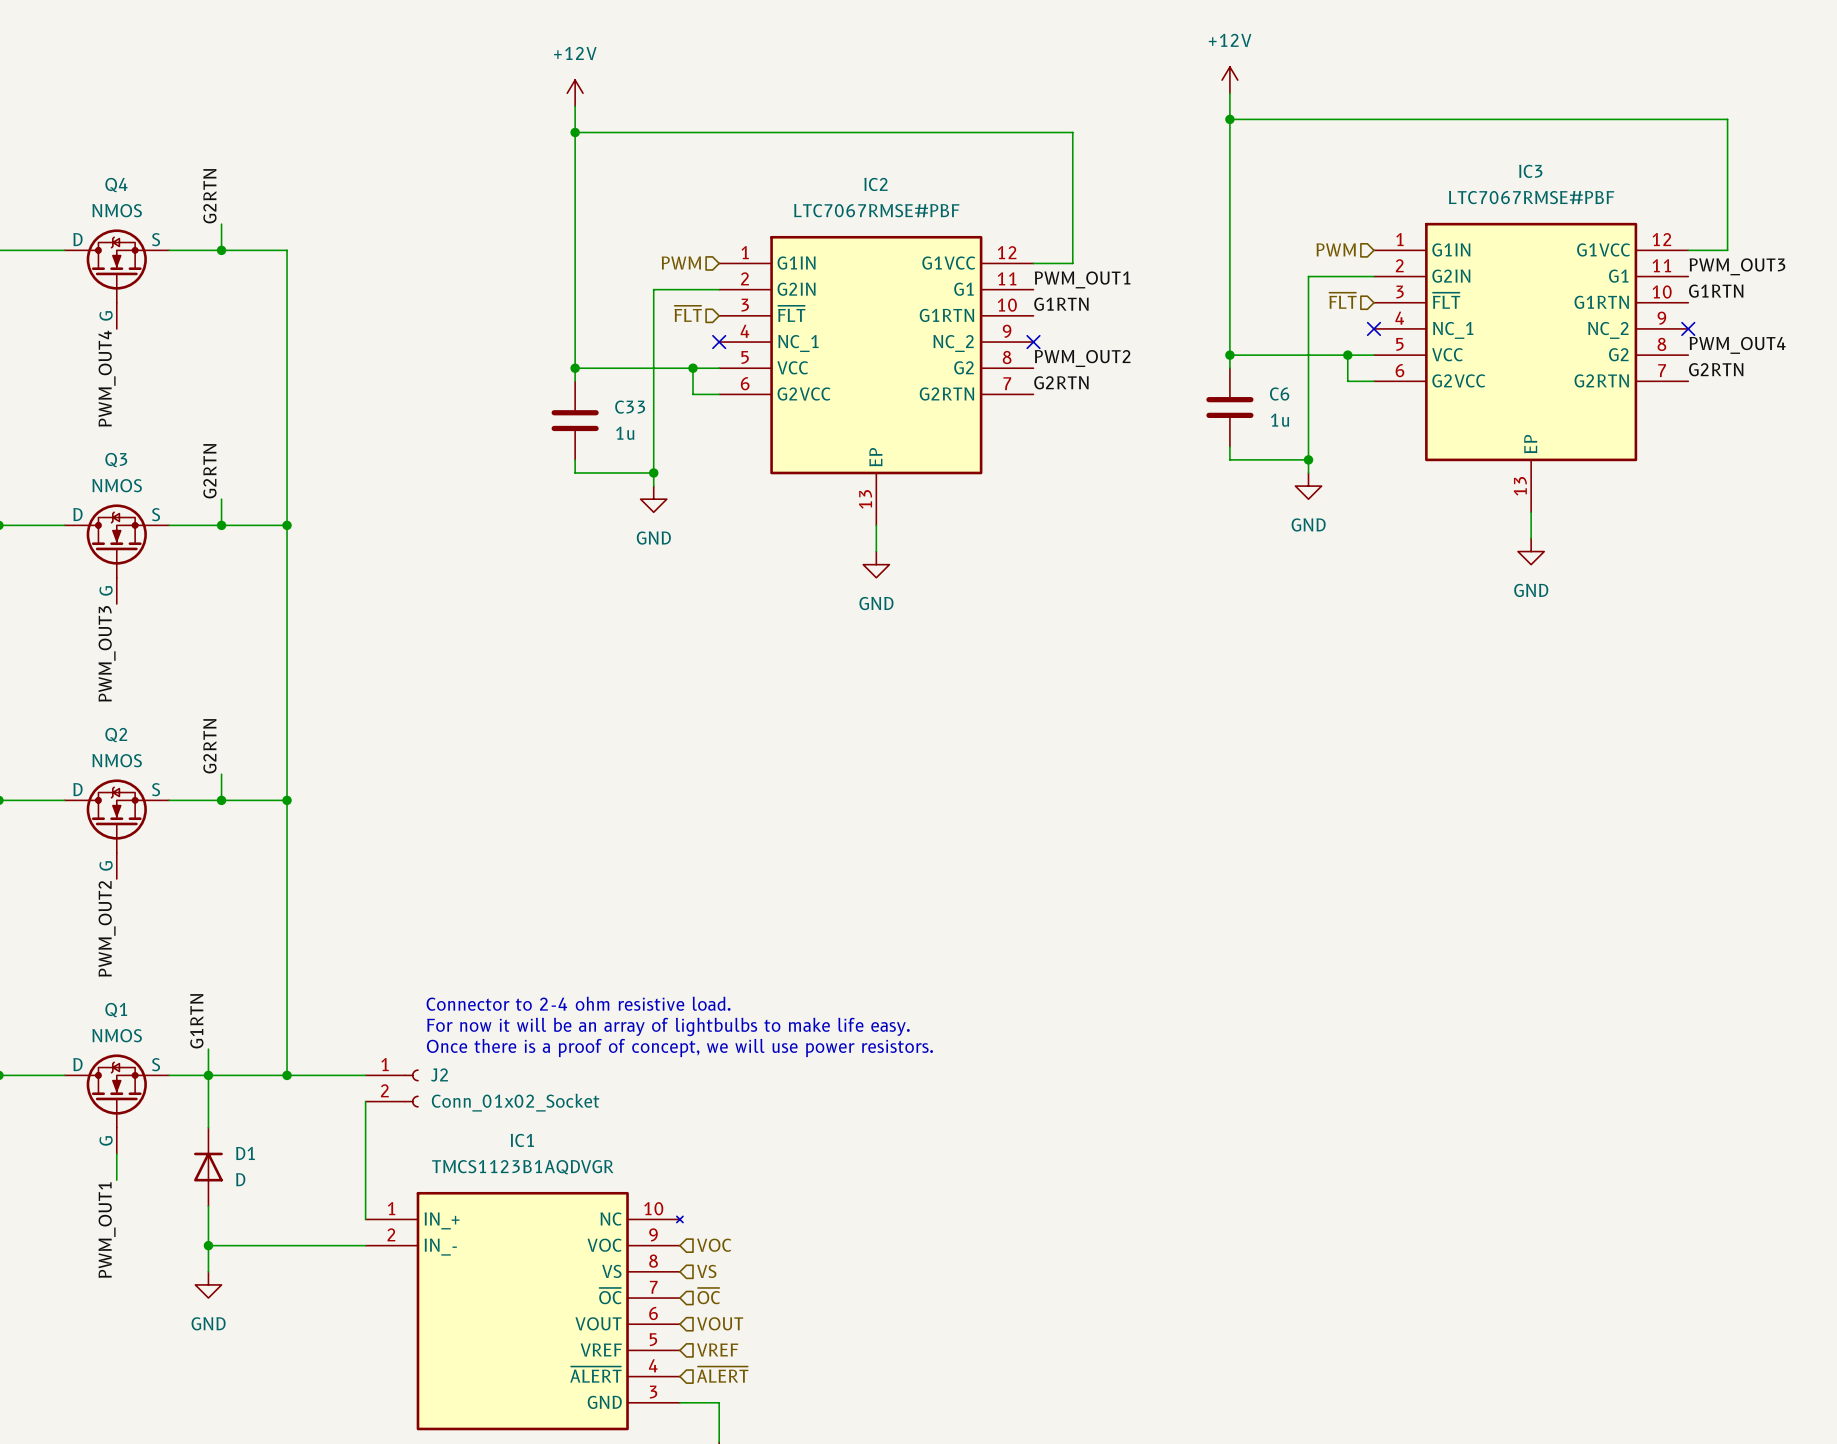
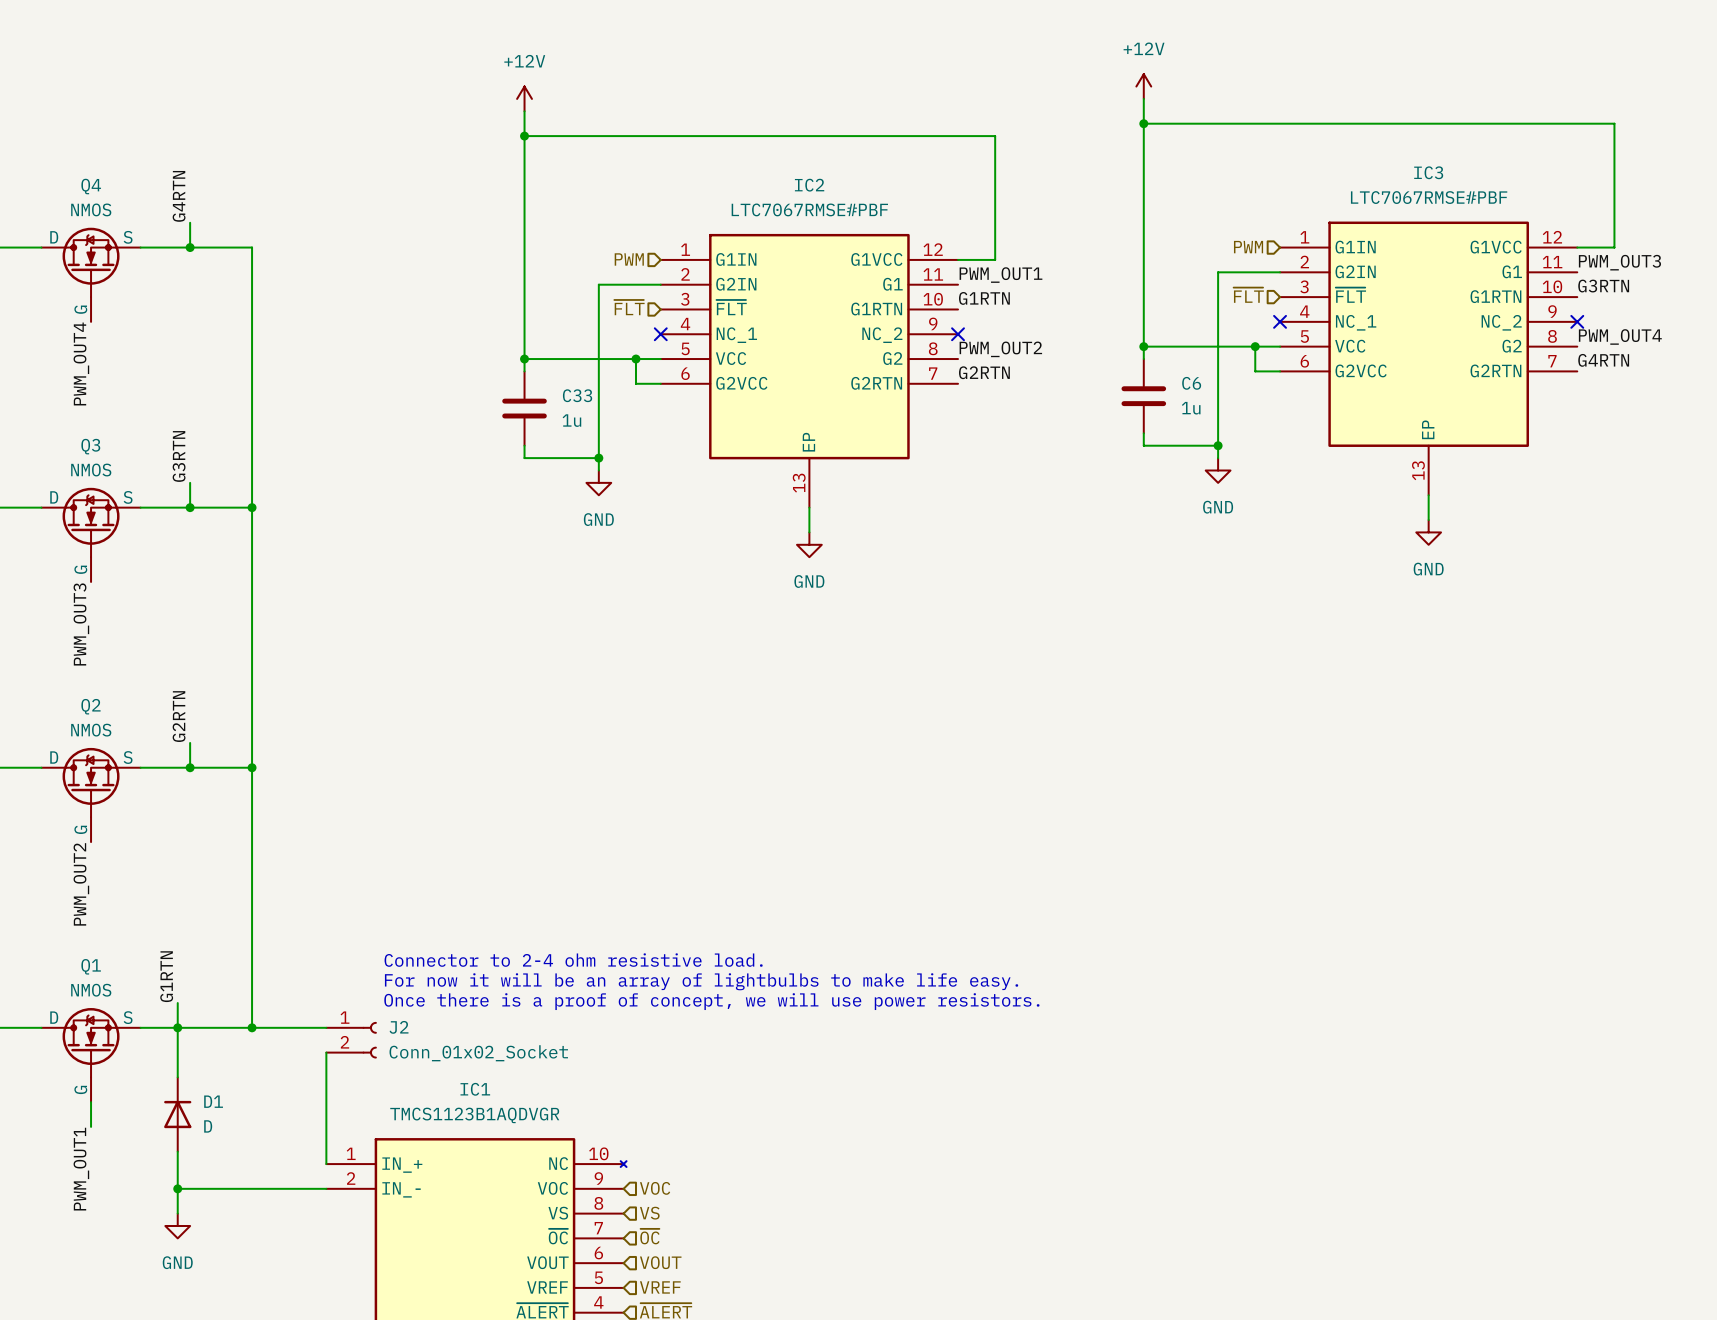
label: G2RTN (209, 196) -> G4RTN (179, 196)
label: G1RTN (1716, 291) -> G3RTN (1603, 286)
label: G2RTN (1716, 369) -> G4RTN (1603, 360)
label: G2RTN (209, 471) -> G3RTN (179, 456)

